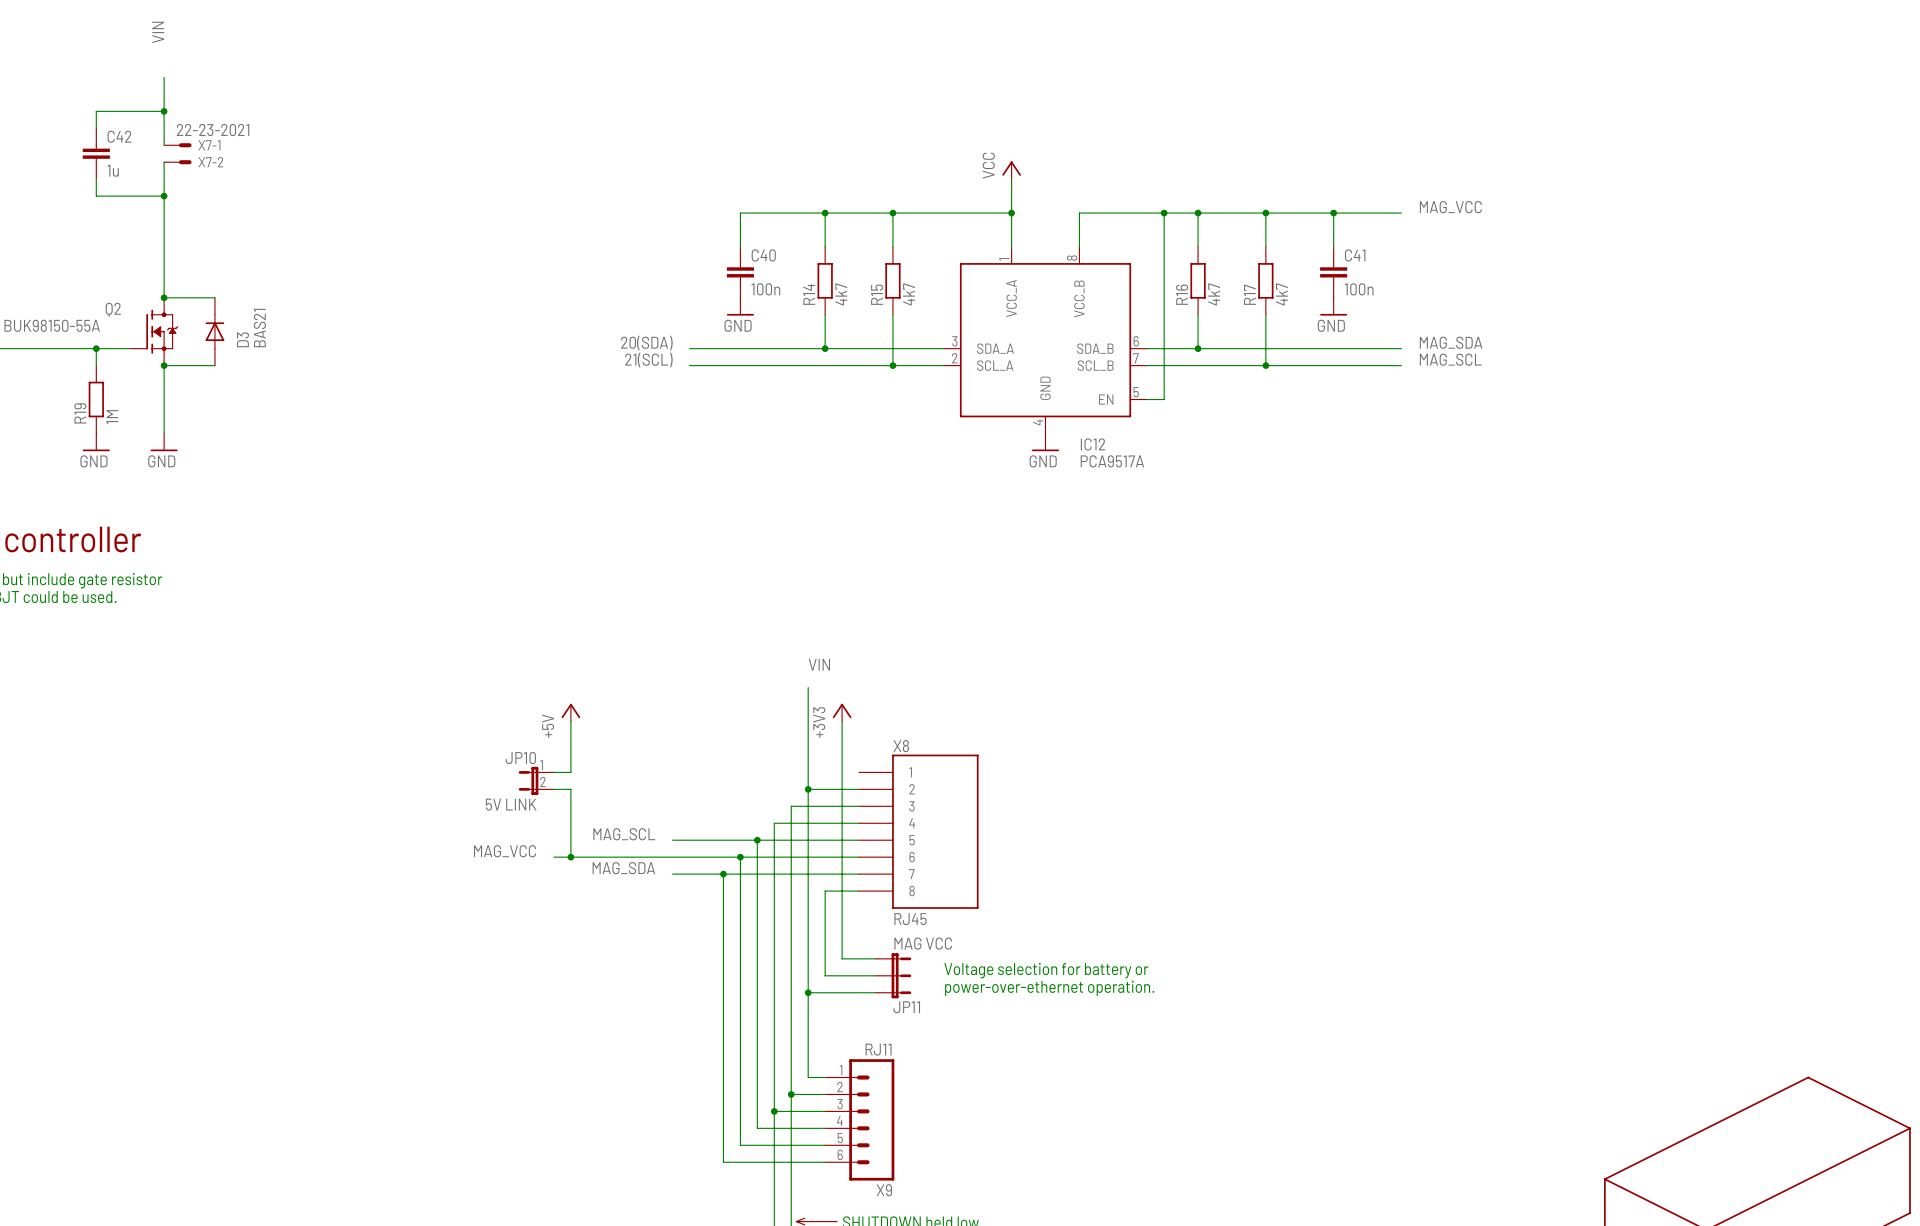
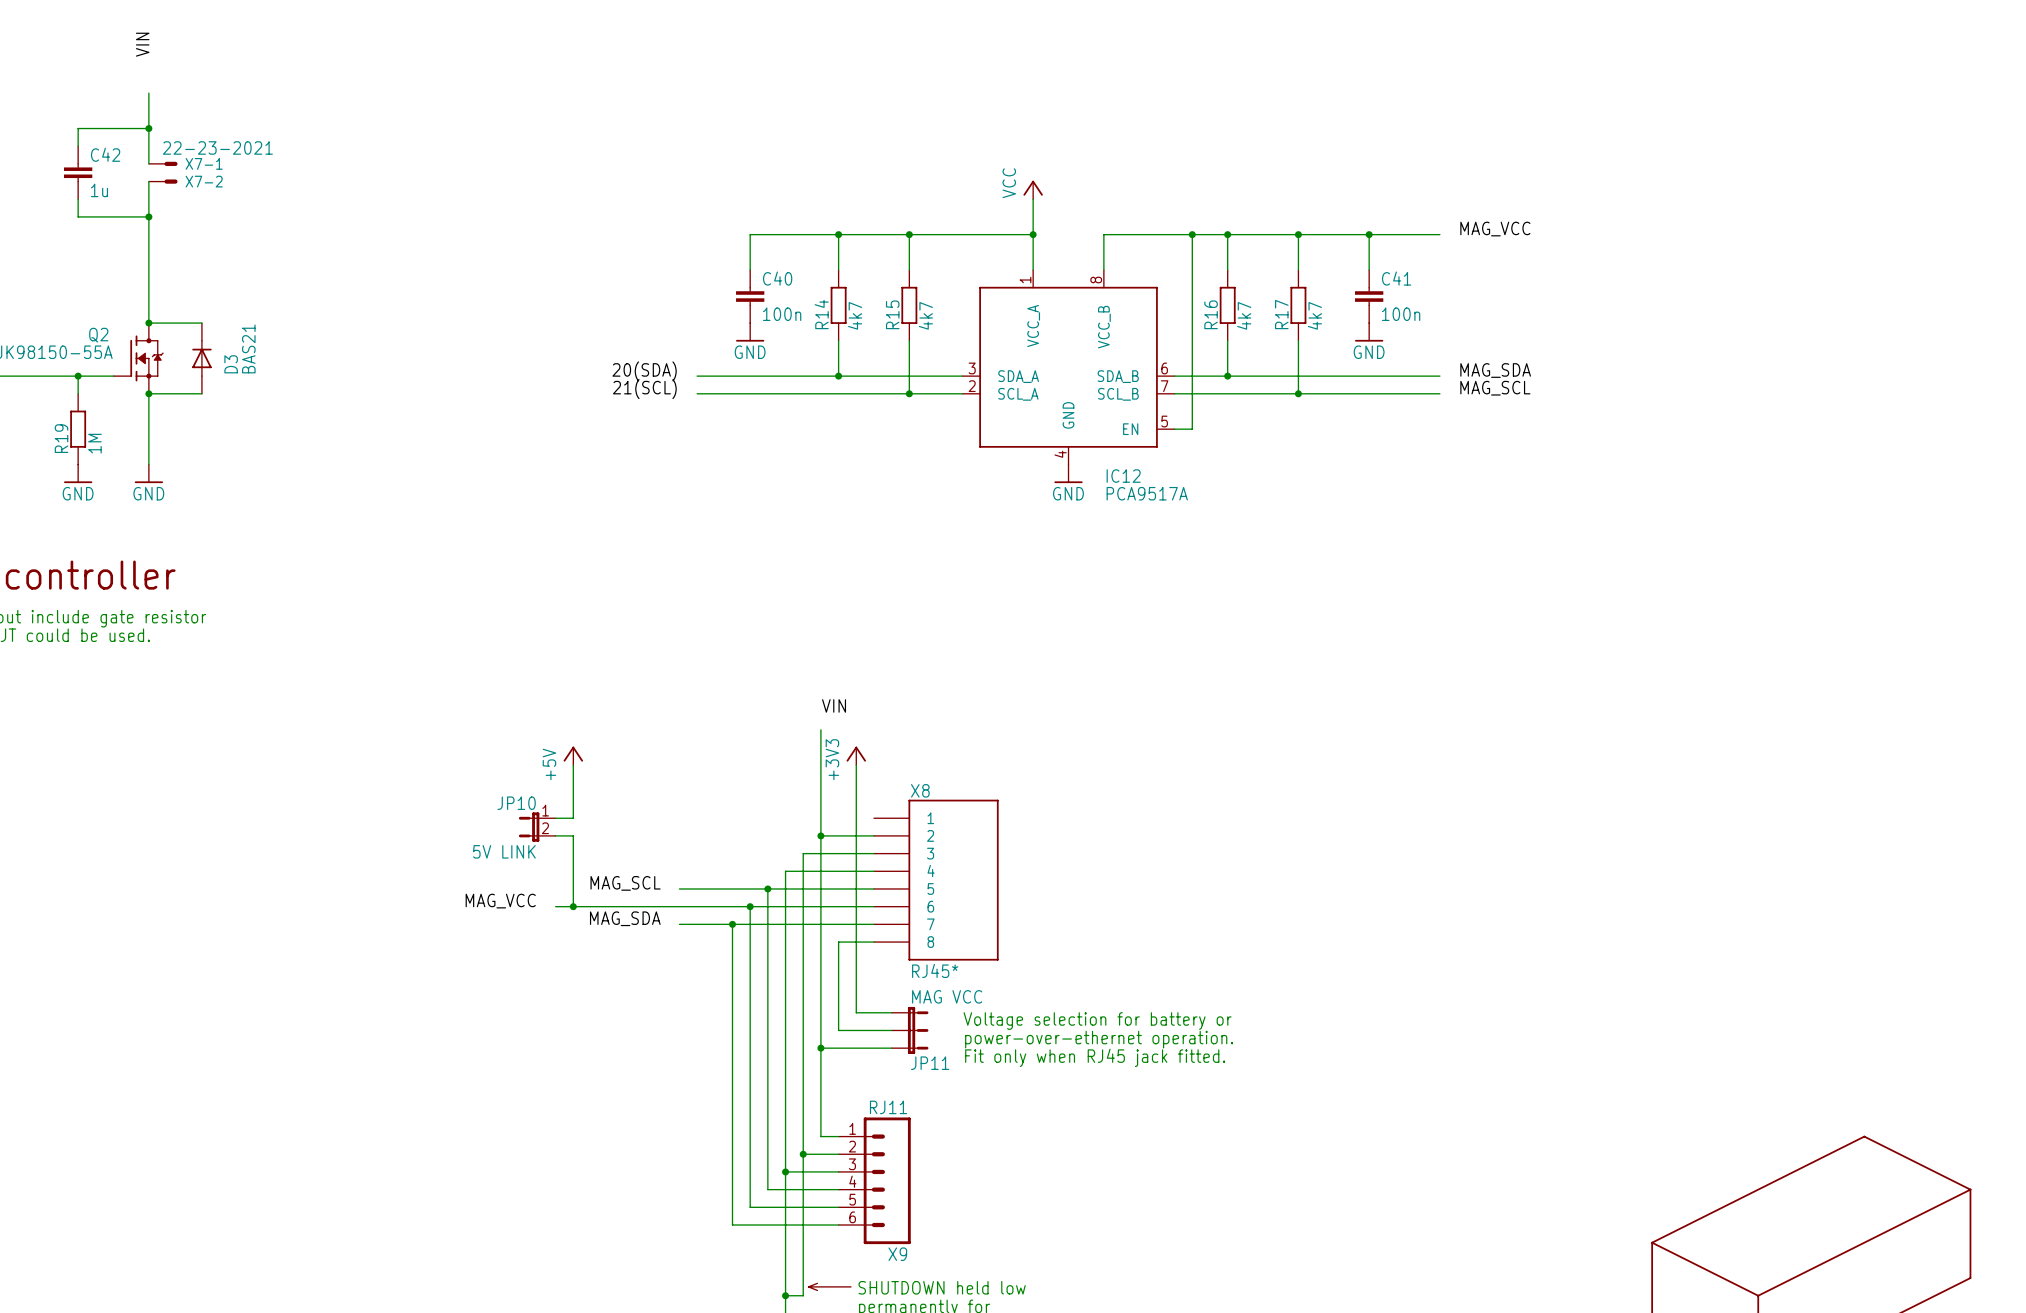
X8 value: RJ45 (910, 919) -> RJ45* (935, 970)
text: none -> Voltage selection for battery or (1097, 1021)
text: Voltage selection for battery or (1046, 970) -> power-over-ethernet operation. (1099, 1039)
text: power-over-ethernet operation. (1049, 988) -> Fit only when RJ45 jack fitted. (1095, 1057)

